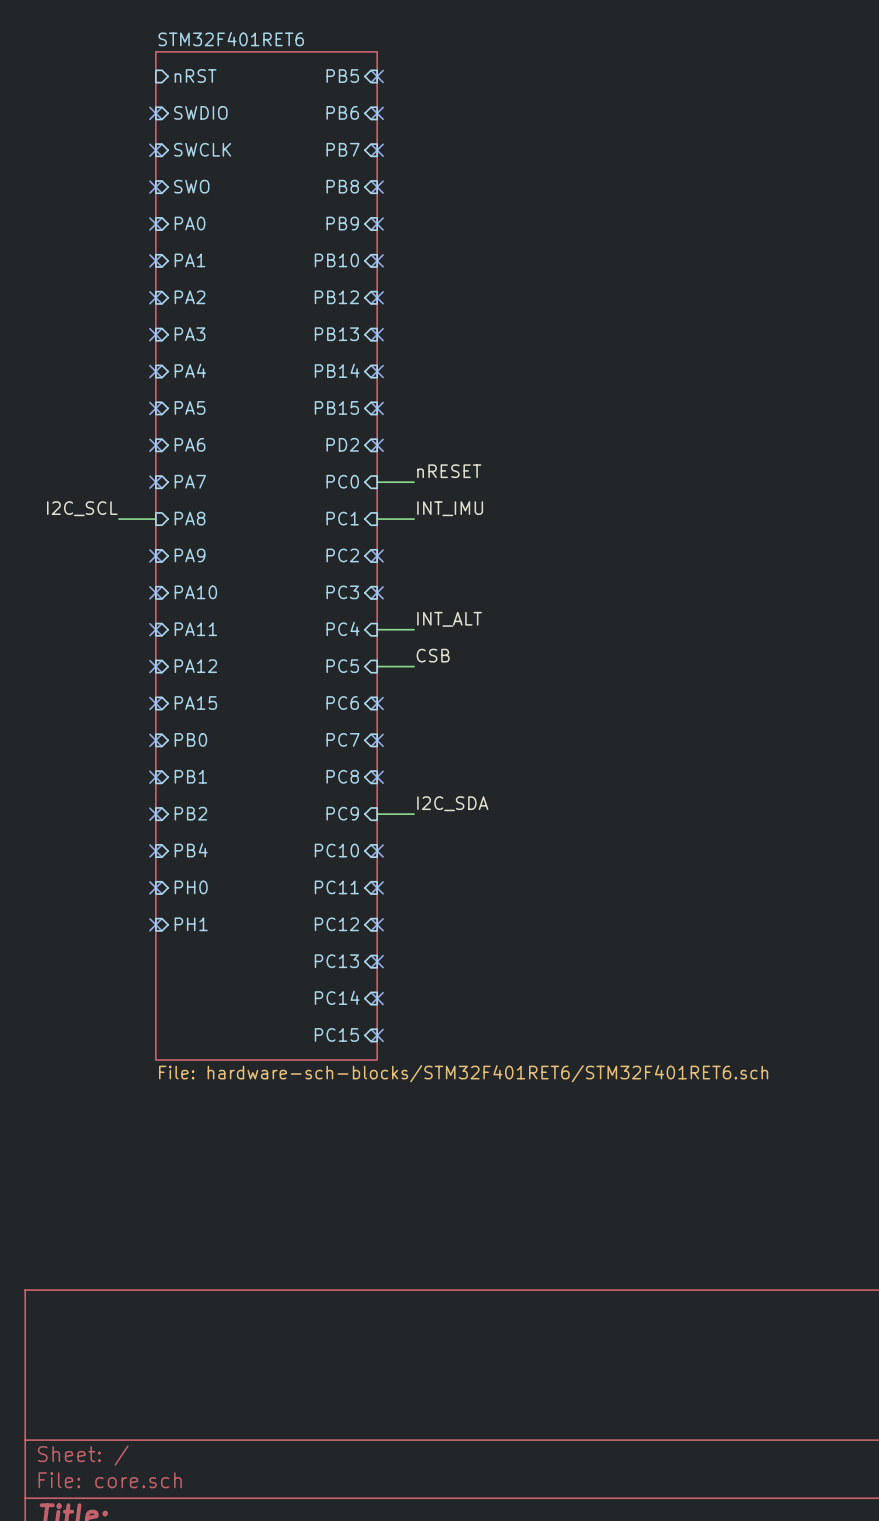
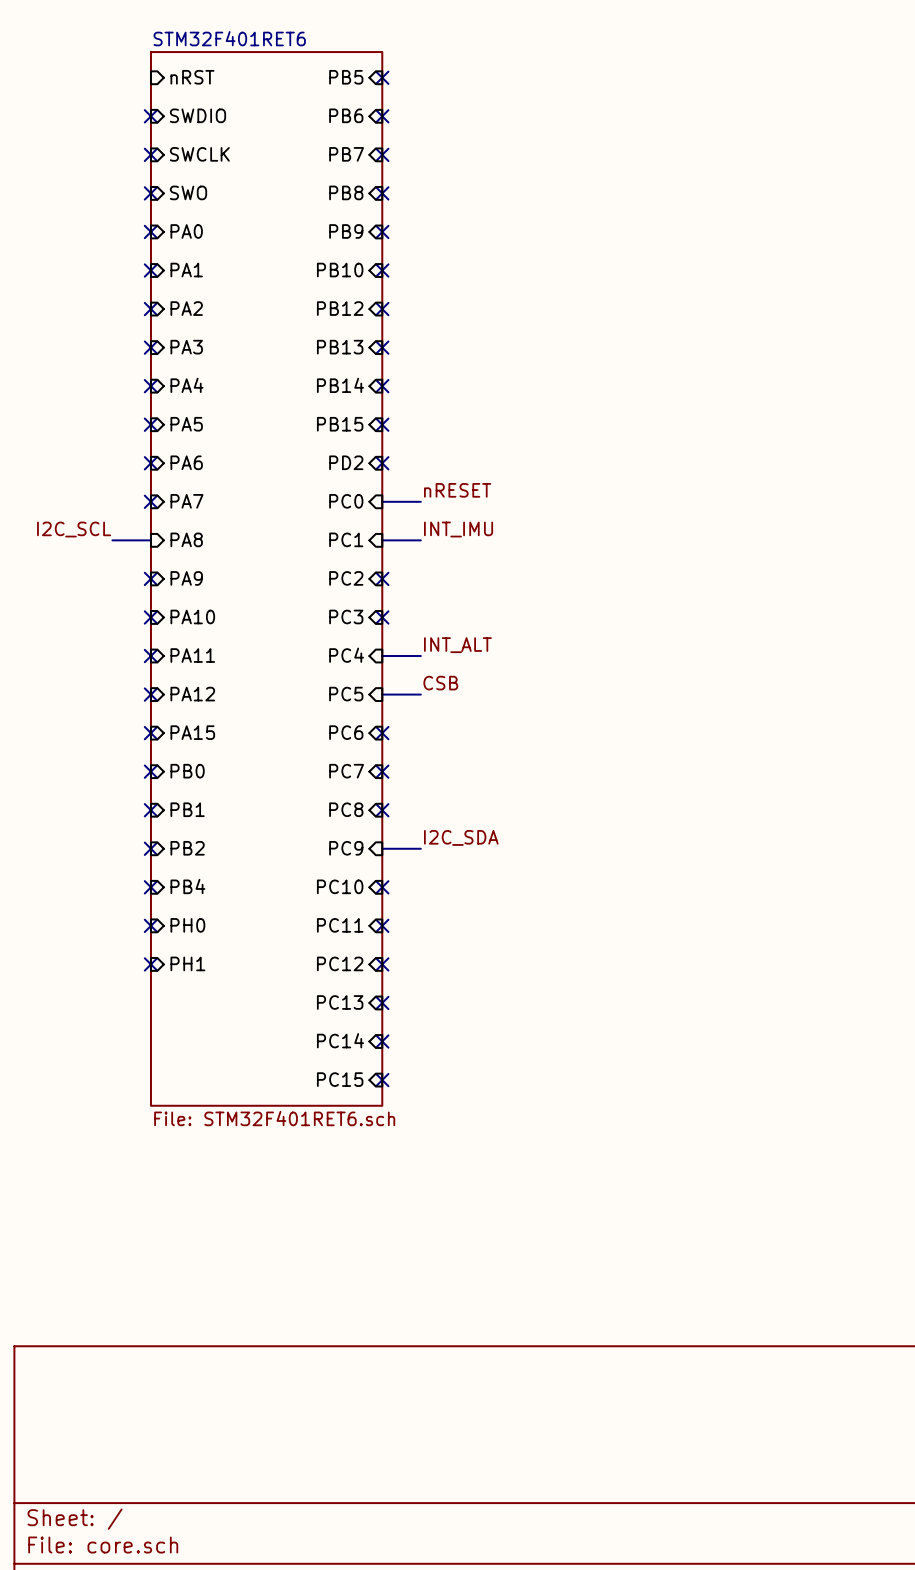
sheet STM32F401RET6 value: File: hardware-sch-blocks/STM32F401RET6/STM32F401RET6.sch (463, 1073) -> File: STM32F401RET6.sch (274, 1118)

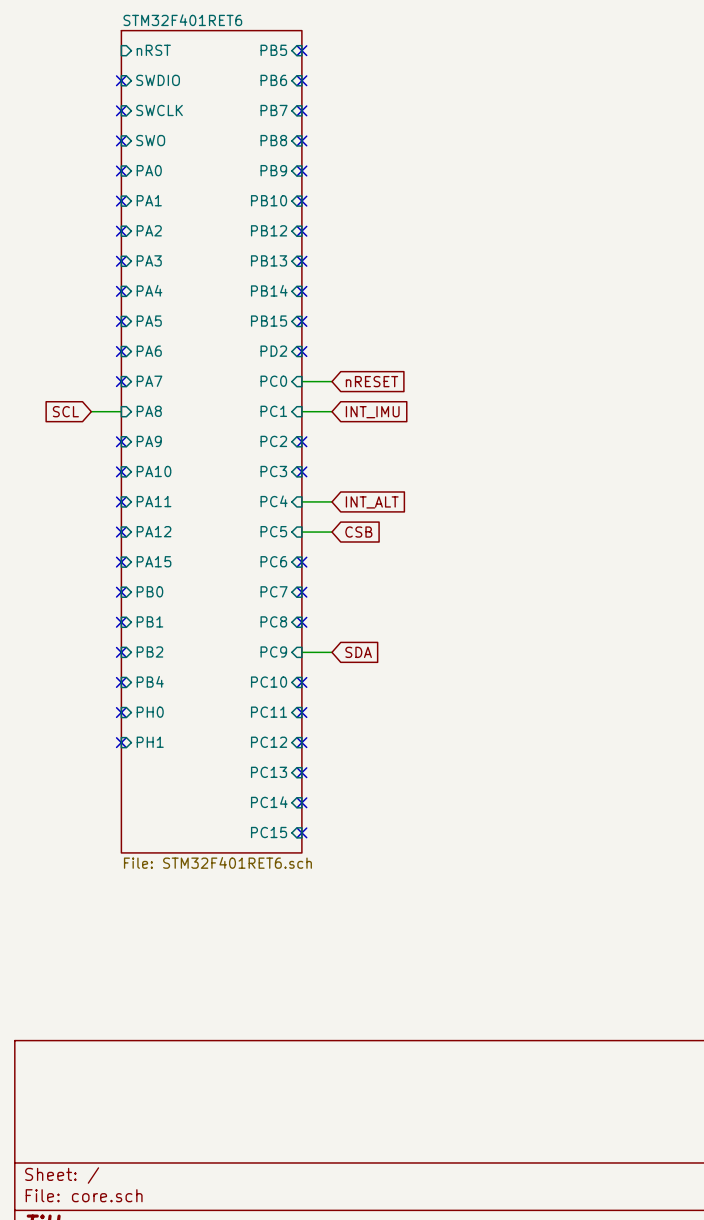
label: nRESET (457, 490) -> none
global label: none -> nRESET (371, 381)
label: I2C_SCL (74, 529) -> none
label: INT_IMU (458, 529) -> none
global label: none -> SCL (65, 411)
global label: none -> INT_IMU (372, 412)
label: INT_ALT (457, 645) -> none
global label: none -> INT_ALT (372, 502)
label: CSB (440, 683) -> none
global label: none -> CSB (358, 532)
label: I2C_SDA (461, 837) -> none
global label: none -> SDA (358, 652)

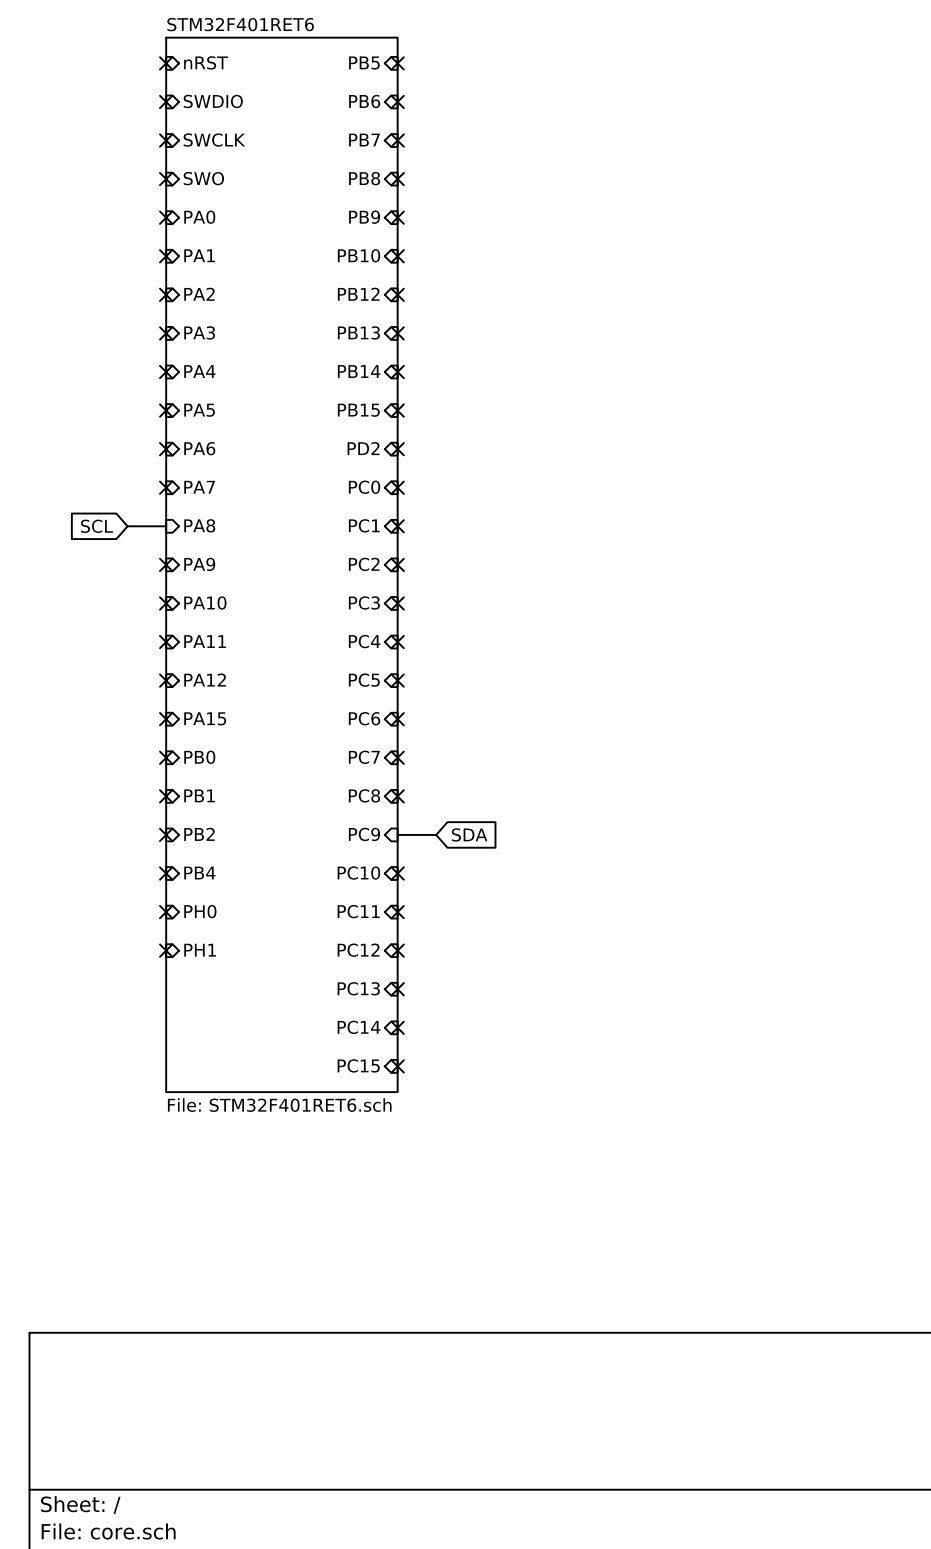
no-connect mark: none -> (166, 63)
wire: (301, 381) (331, 381) -> none
no-connect mark: none -> (397, 487)
global label: nRESET (371, 381) -> none
wire: (301, 411) (331, 411) -> none
no-connect mark: none -> (397, 526)
global label: INT_IMU (372, 412) -> none
wire: (301, 501) (331, 501) -> none
no-connect mark: none -> (397, 642)
global label: INT_ALT (372, 502) -> none
wire: (301, 532) (331, 532) -> none
no-connect mark: none -> (397, 680)
global label: CSB (358, 532) -> none

